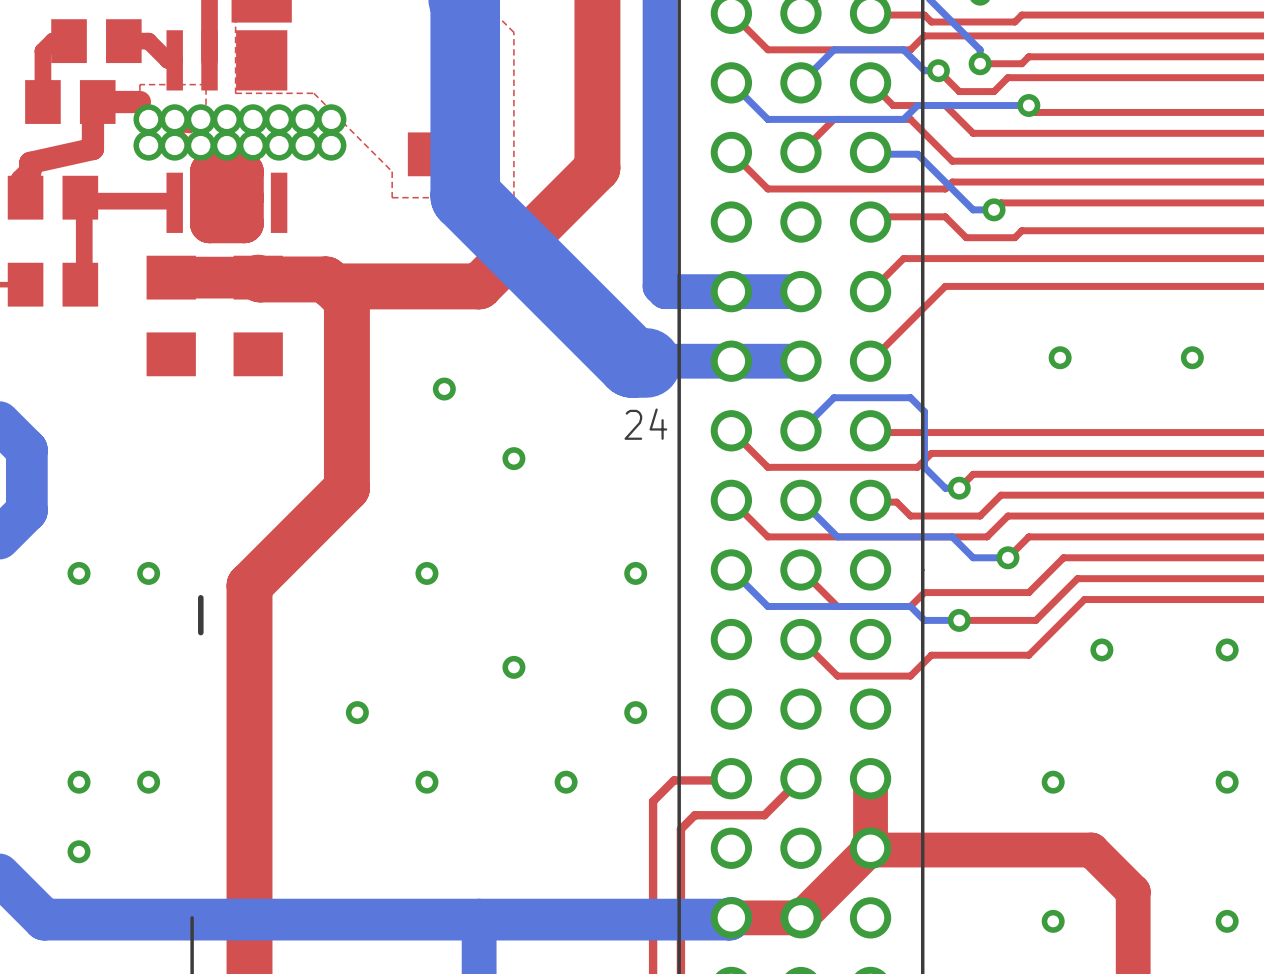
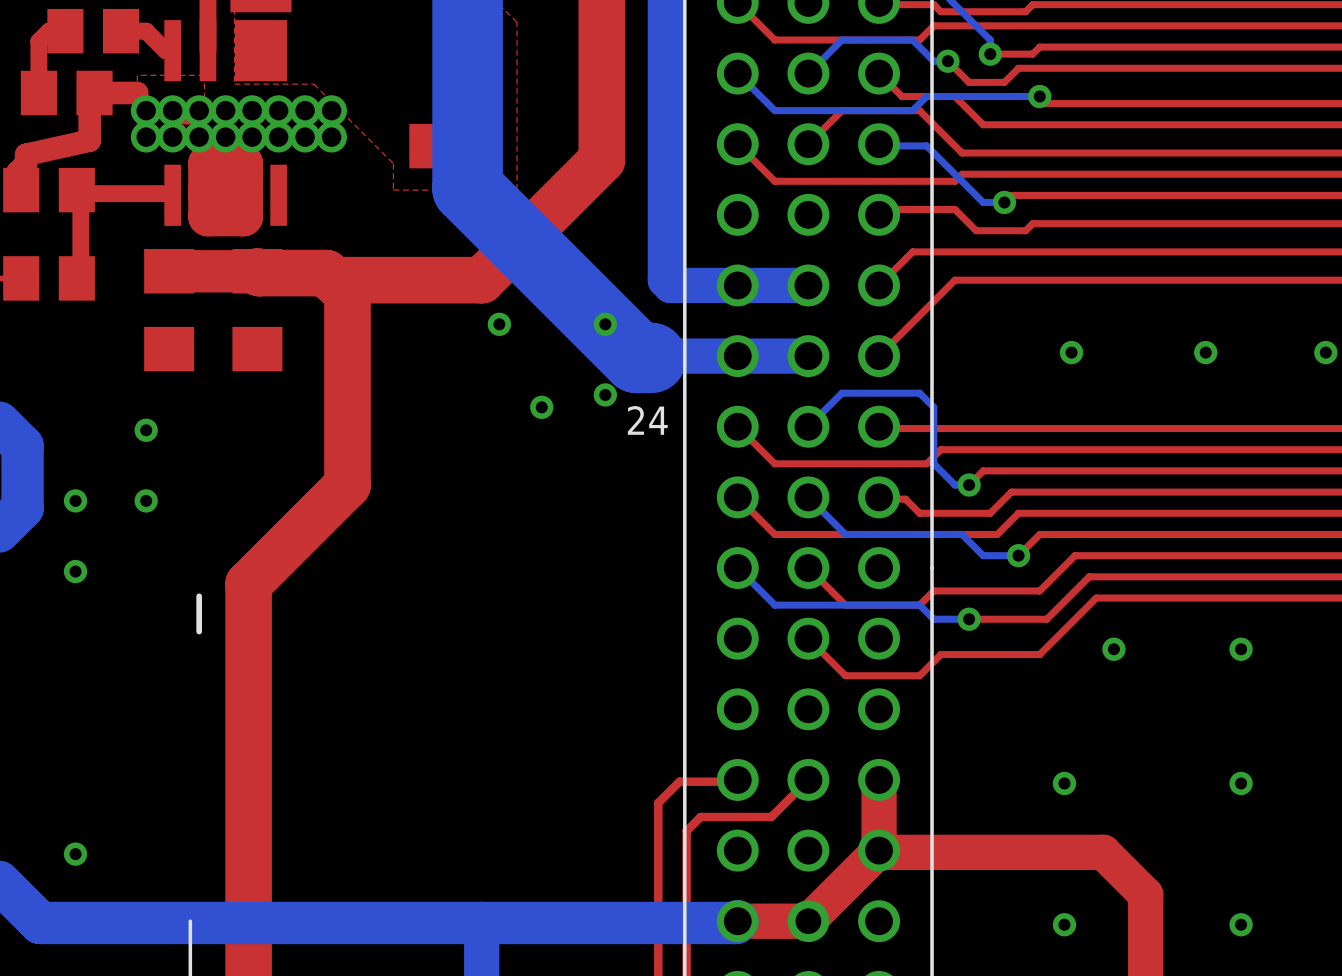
via: none -> (499, 324)
via: none -> (605, 324)
via: (444, 389) -> none
via: none -> (605, 394)
via: none -> (541, 407)
via: none -> (146, 430)
via: (513, 458) -> none
via: none -> (75, 500)
via: none -> (146, 500)
via: (148, 573) -> none
via: (426, 573) -> none
via: (635, 573) -> none
via: (513, 667) -> none
via: (357, 712) -> none
via: (635, 712) -> none
via: (79, 782) -> none
via: (148, 782) -> none
via: (426, 782) -> none
via: (566, 782) -> none

